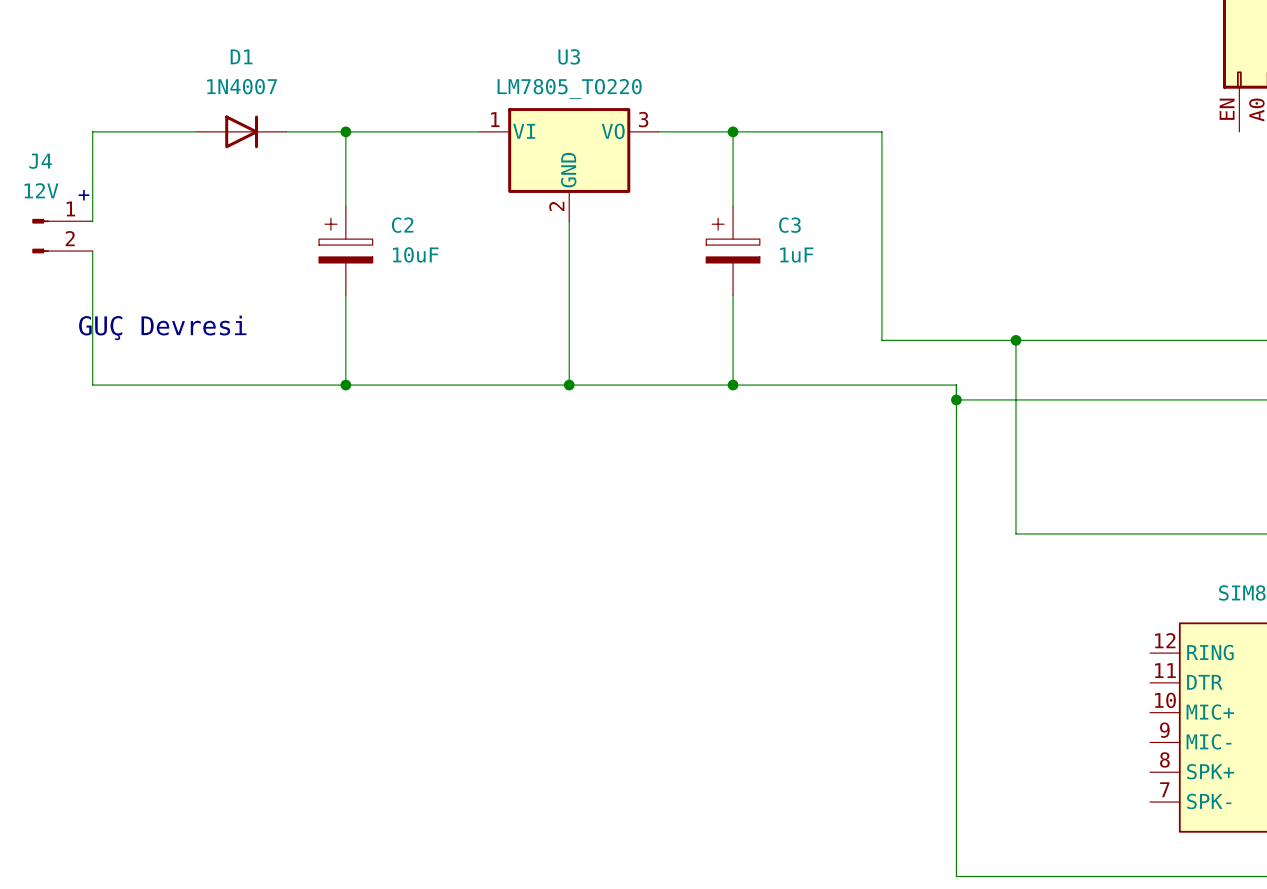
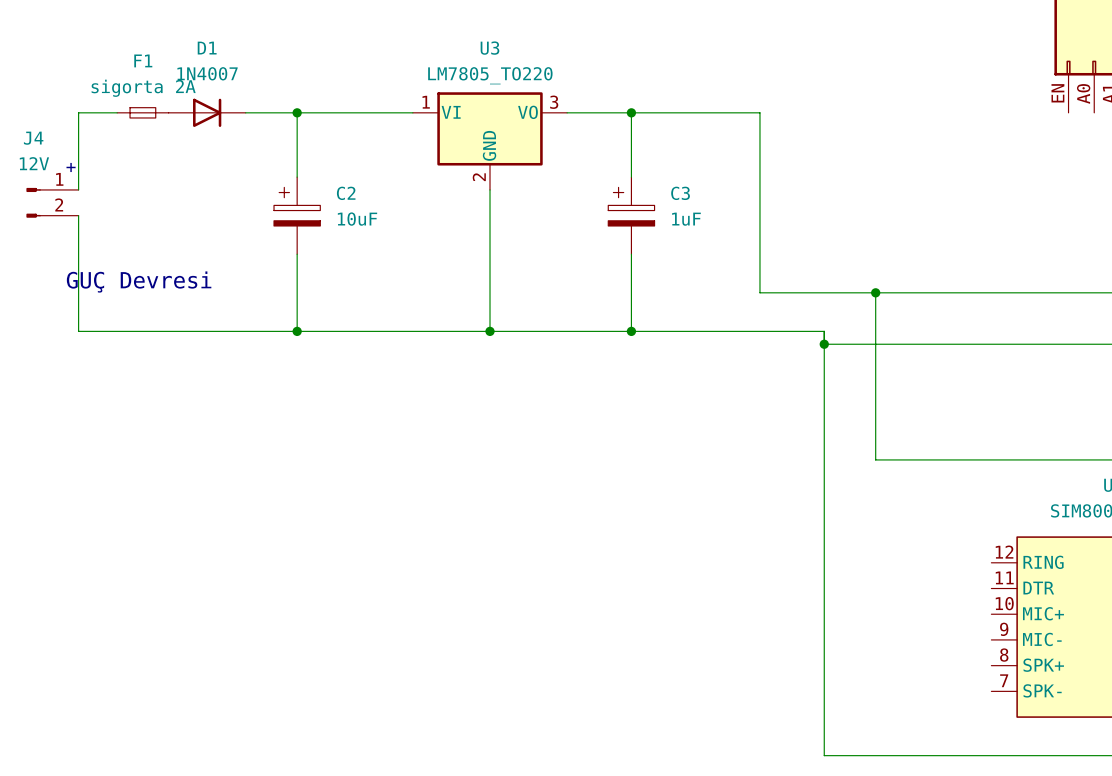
F1: none -> sigorta 2A (142, 112)

